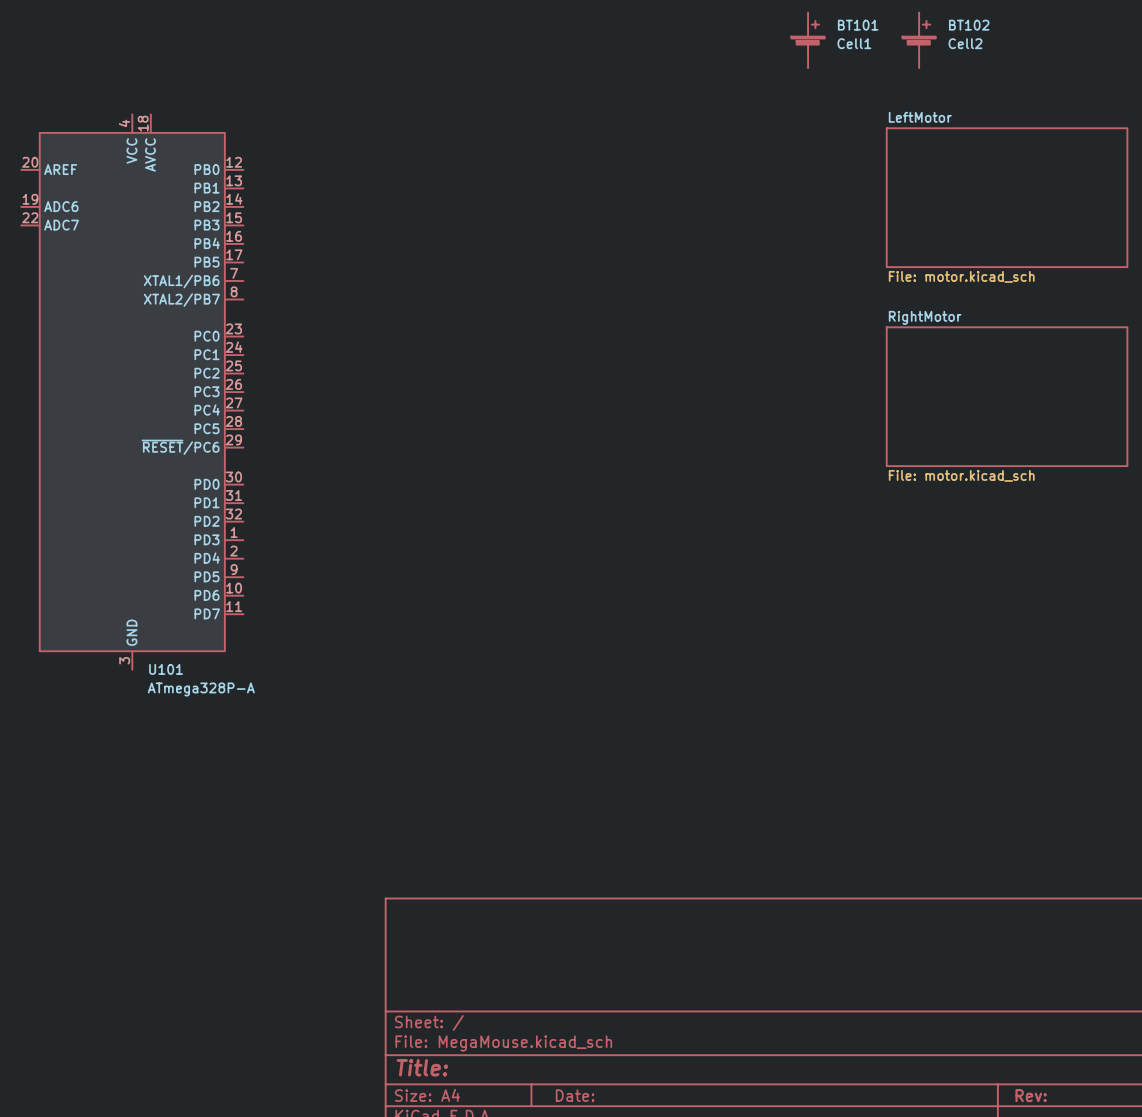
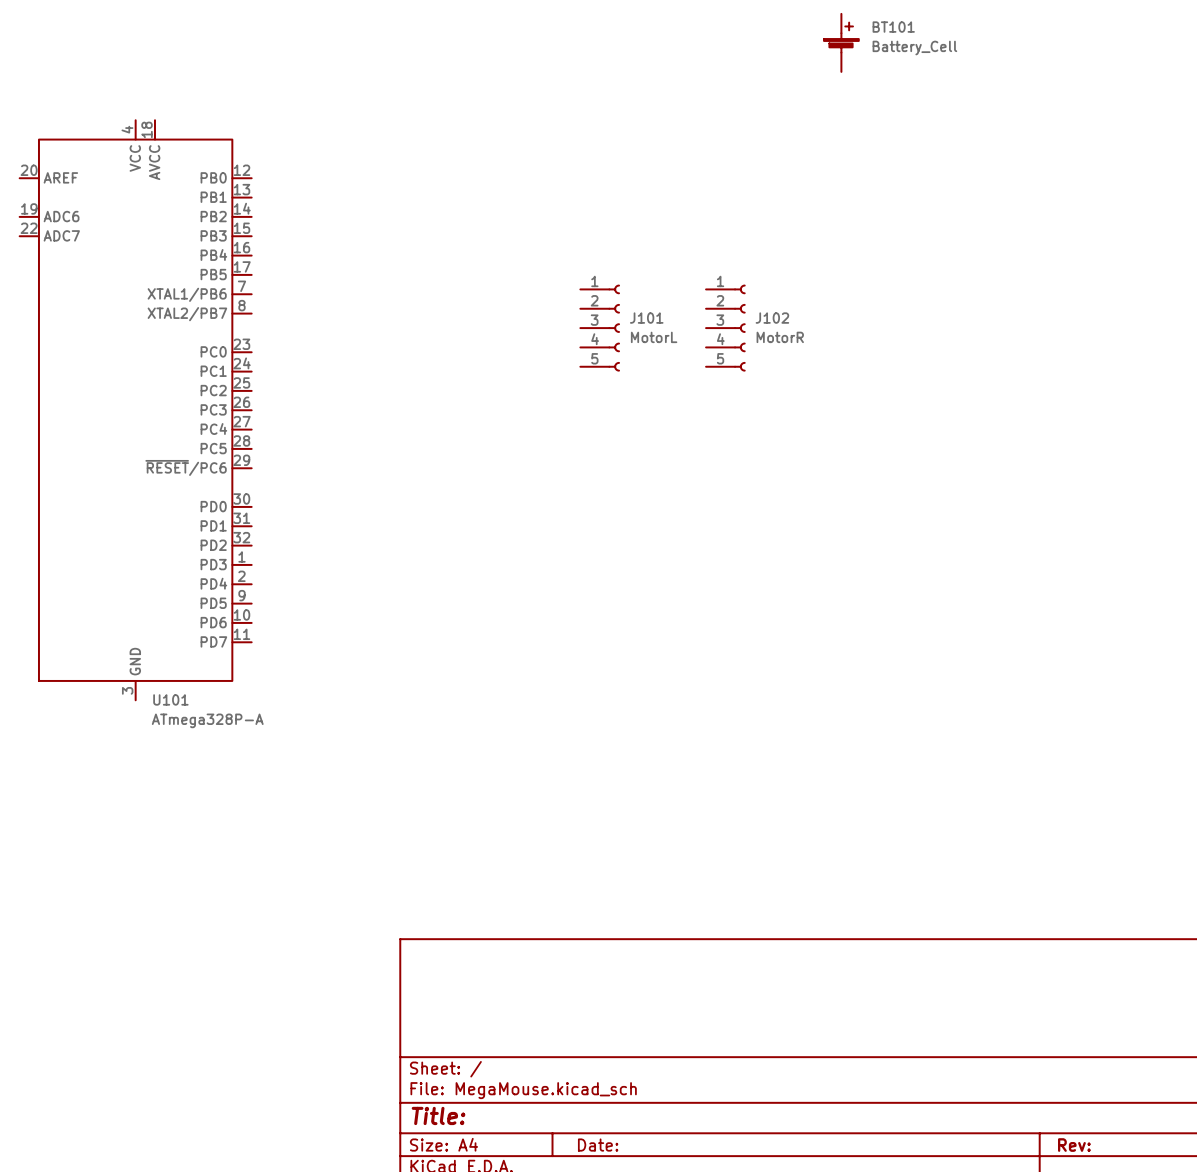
BT102: Cell2 (919, 40) -> none
BT101 value: Cell1 (854, 43) -> Battery_Cell (914, 48)
sheet LeftMotor: File: motor.kicad_sch (1007, 197) -> none
J101: none -> MotorL (599, 328)
J102: none -> MotorR (725, 328)
sheet RightMotor: File: motor.kicad_sch (1007, 396) -> none

